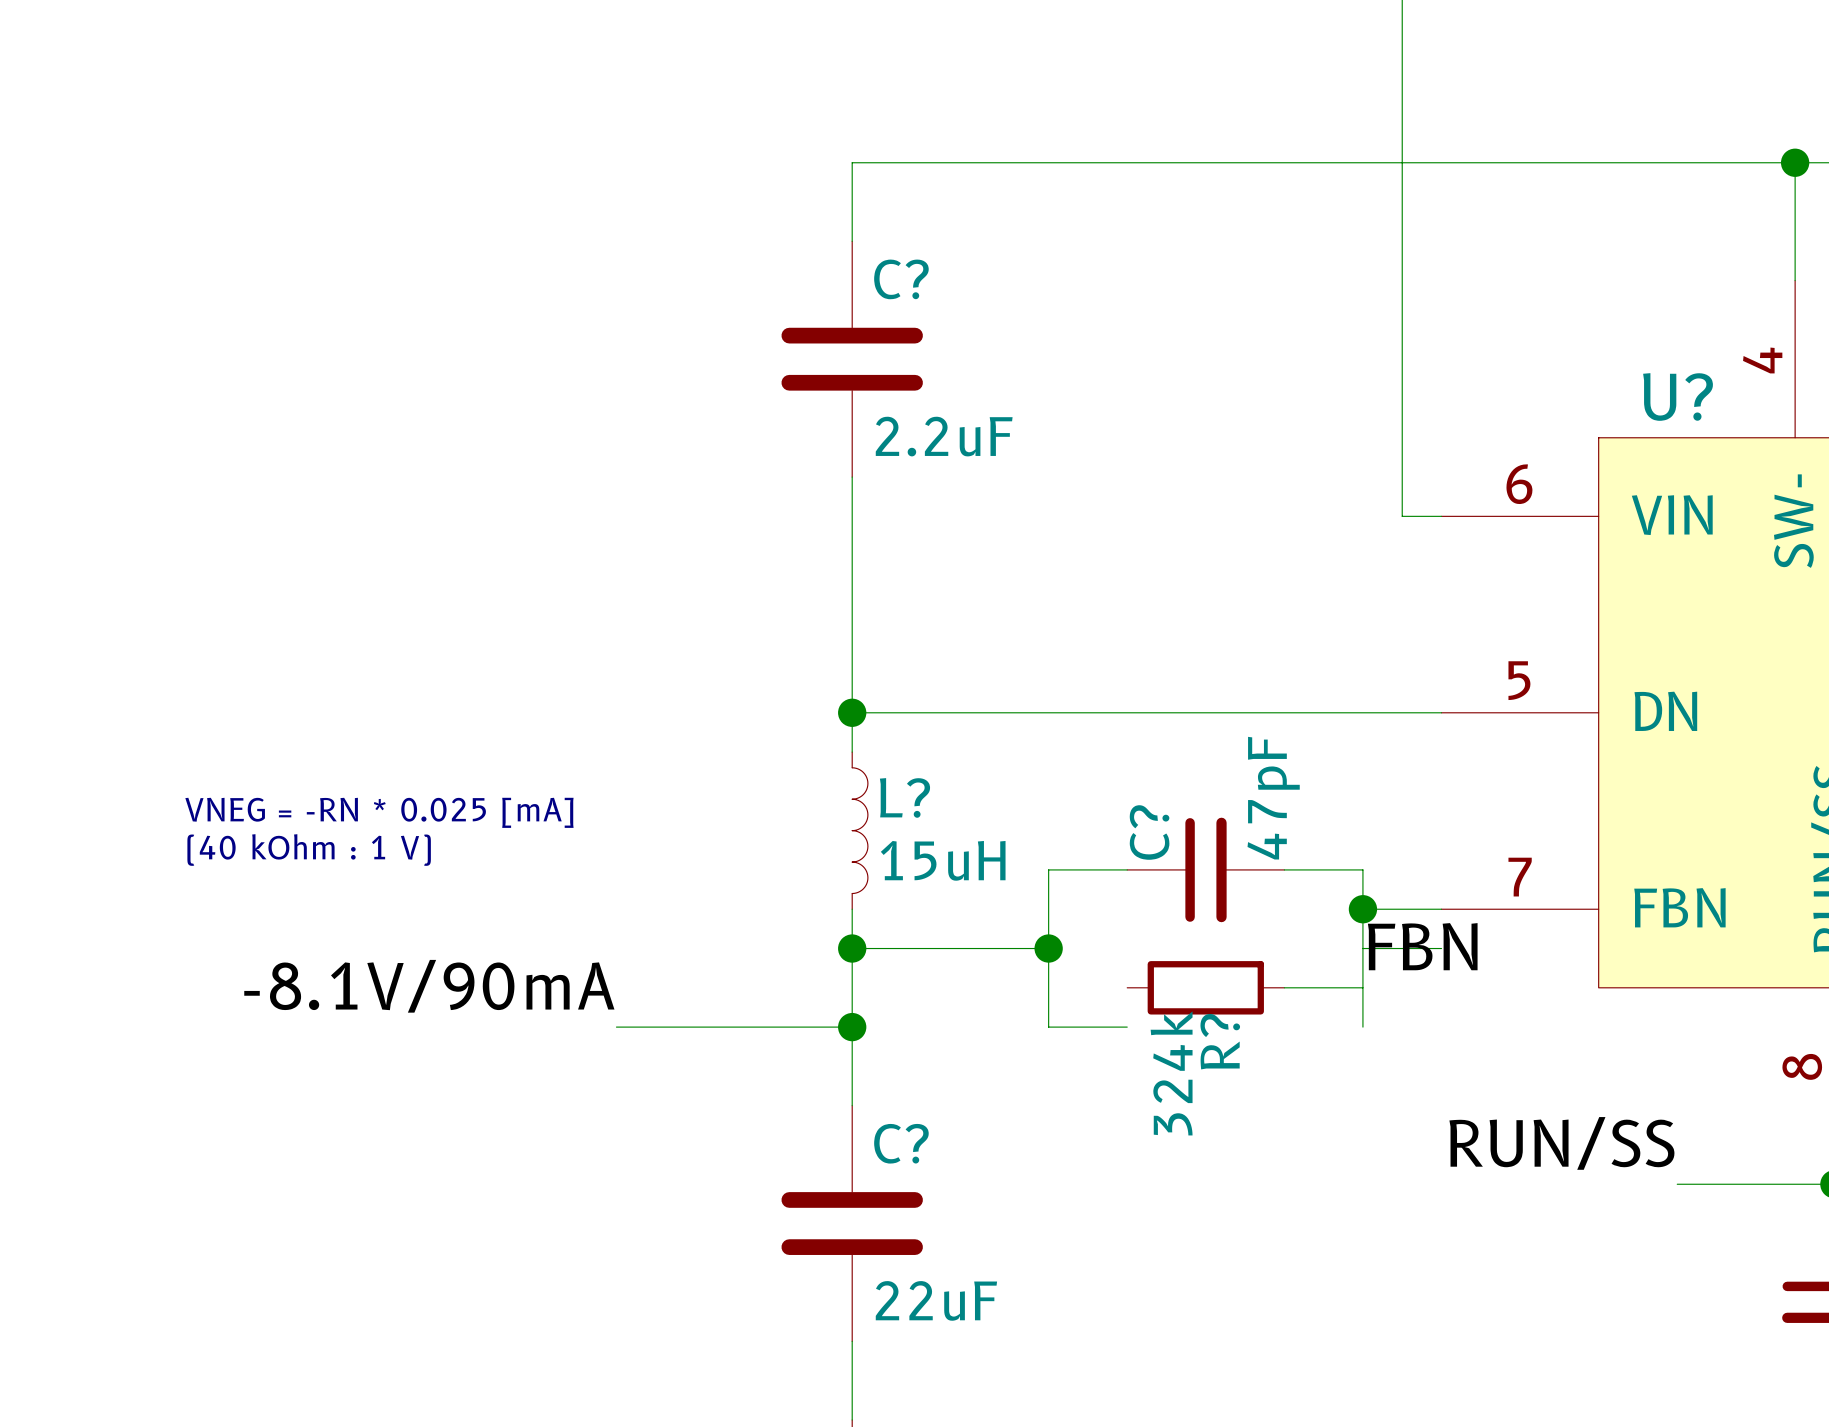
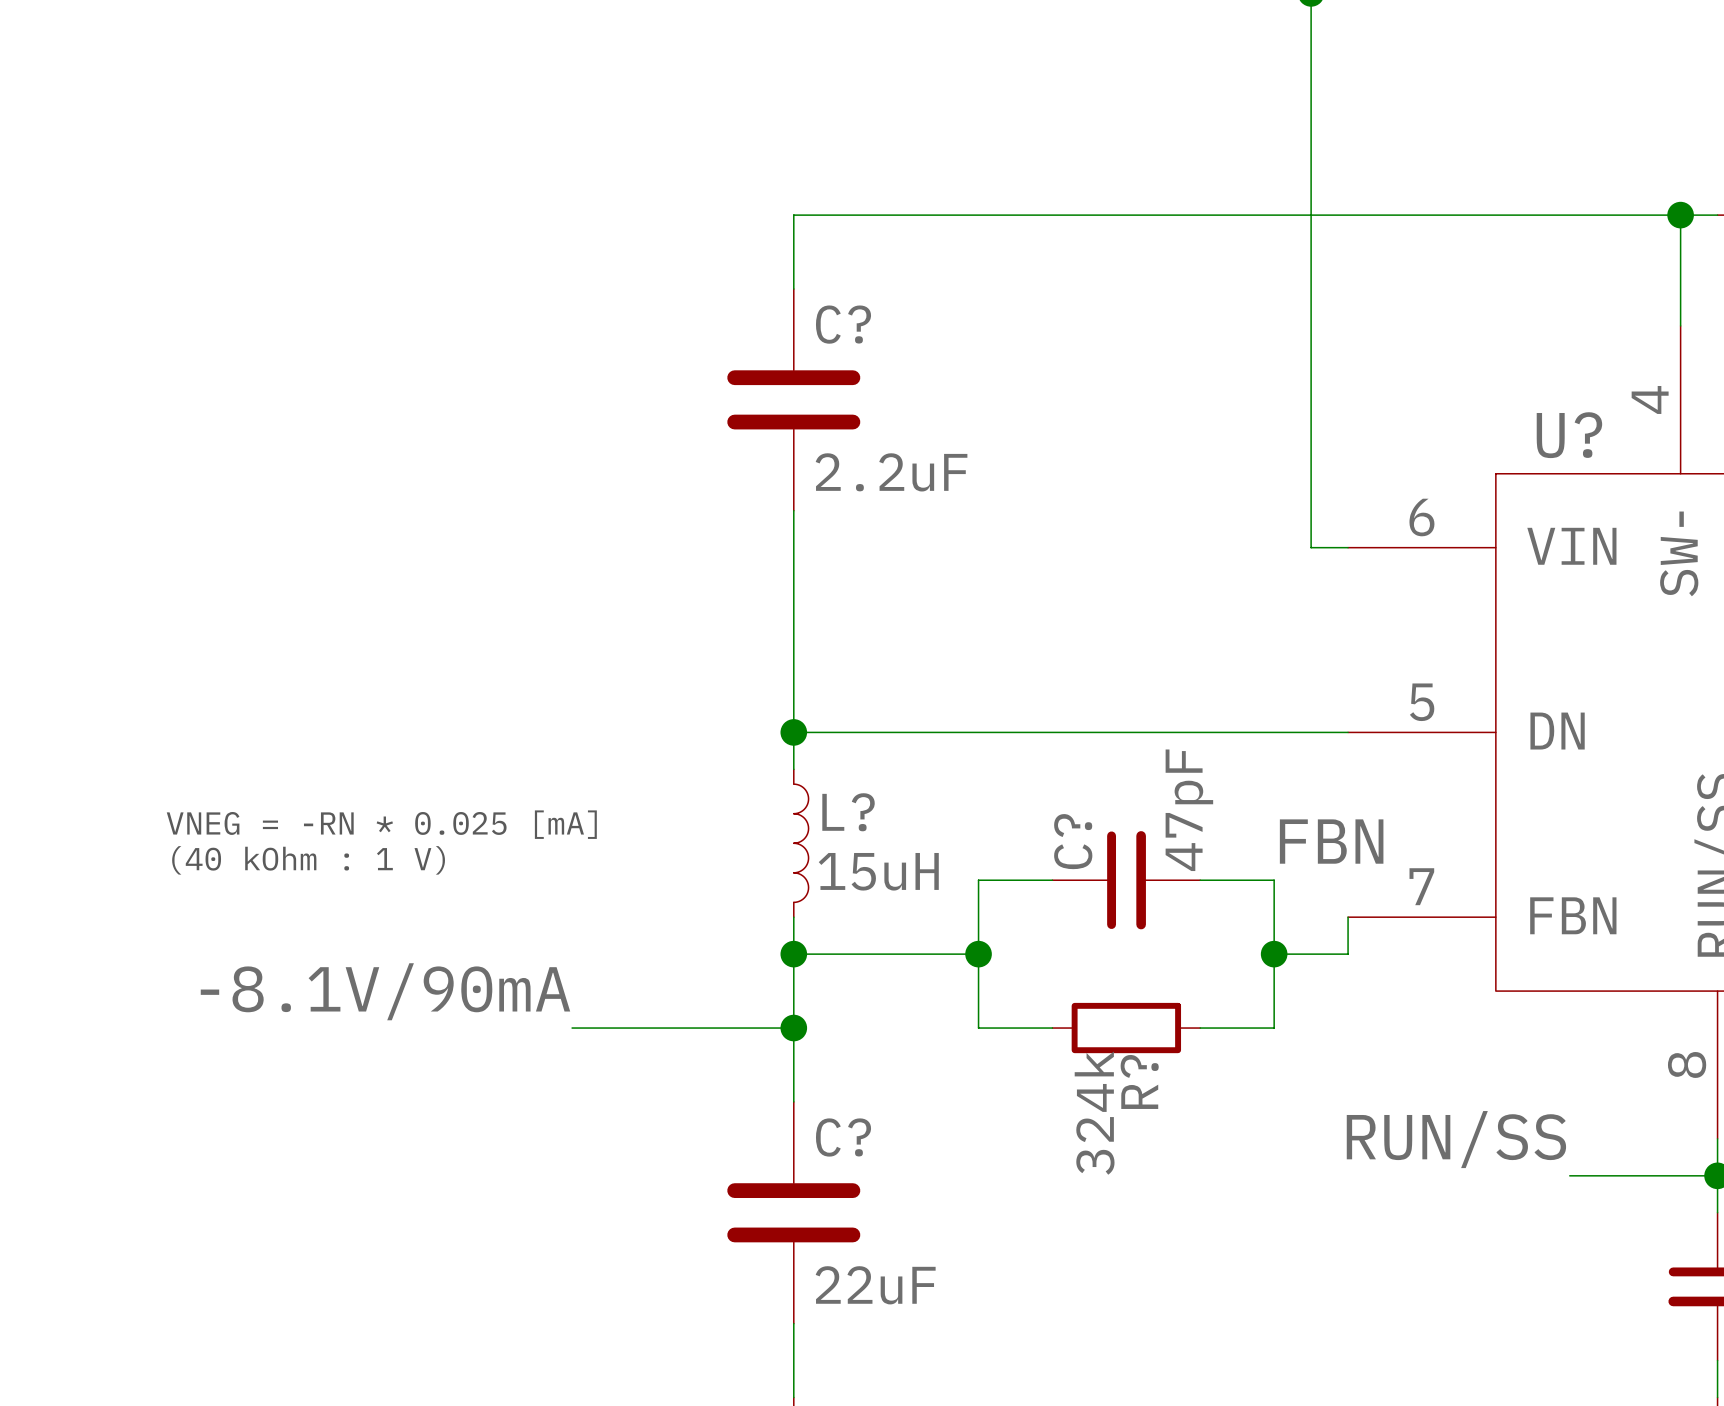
wire: (1362, 909) (1441, 909) -> (1348, 954) (1348, 917)
junction position: (1362, 909) -> (1274, 954)
label position: FBN (1422, 946) -> FBN (1331, 841)
R? position: (1205, 987) -> (1126, 1028)
wire: (1284, 987) (1362, 987) -> (1200, 1028) (1274, 1028)

